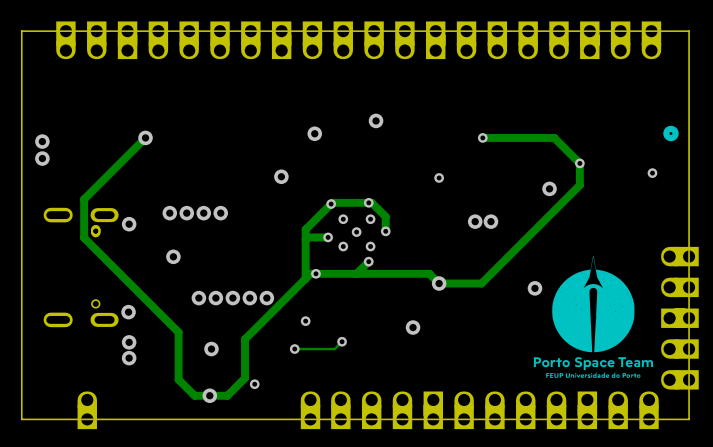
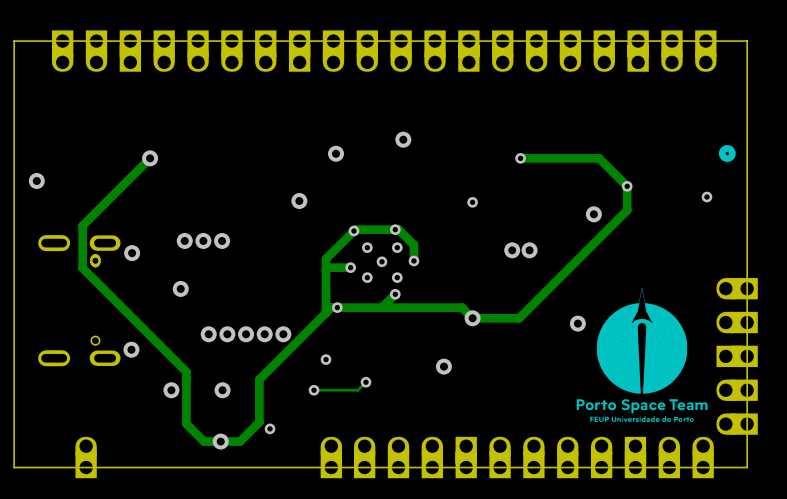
via: (42, 141) -> none
via: (169, 213) -> none
via: none -> (184, 240)
via: (186, 213) -> none
via: none -> (203, 240)
via: (203, 213) -> none
via: none -> (222, 240)
via: (220, 213) -> none
via: (129, 342) -> none
via: none -> (171, 390)
via: (129, 358) -> none

